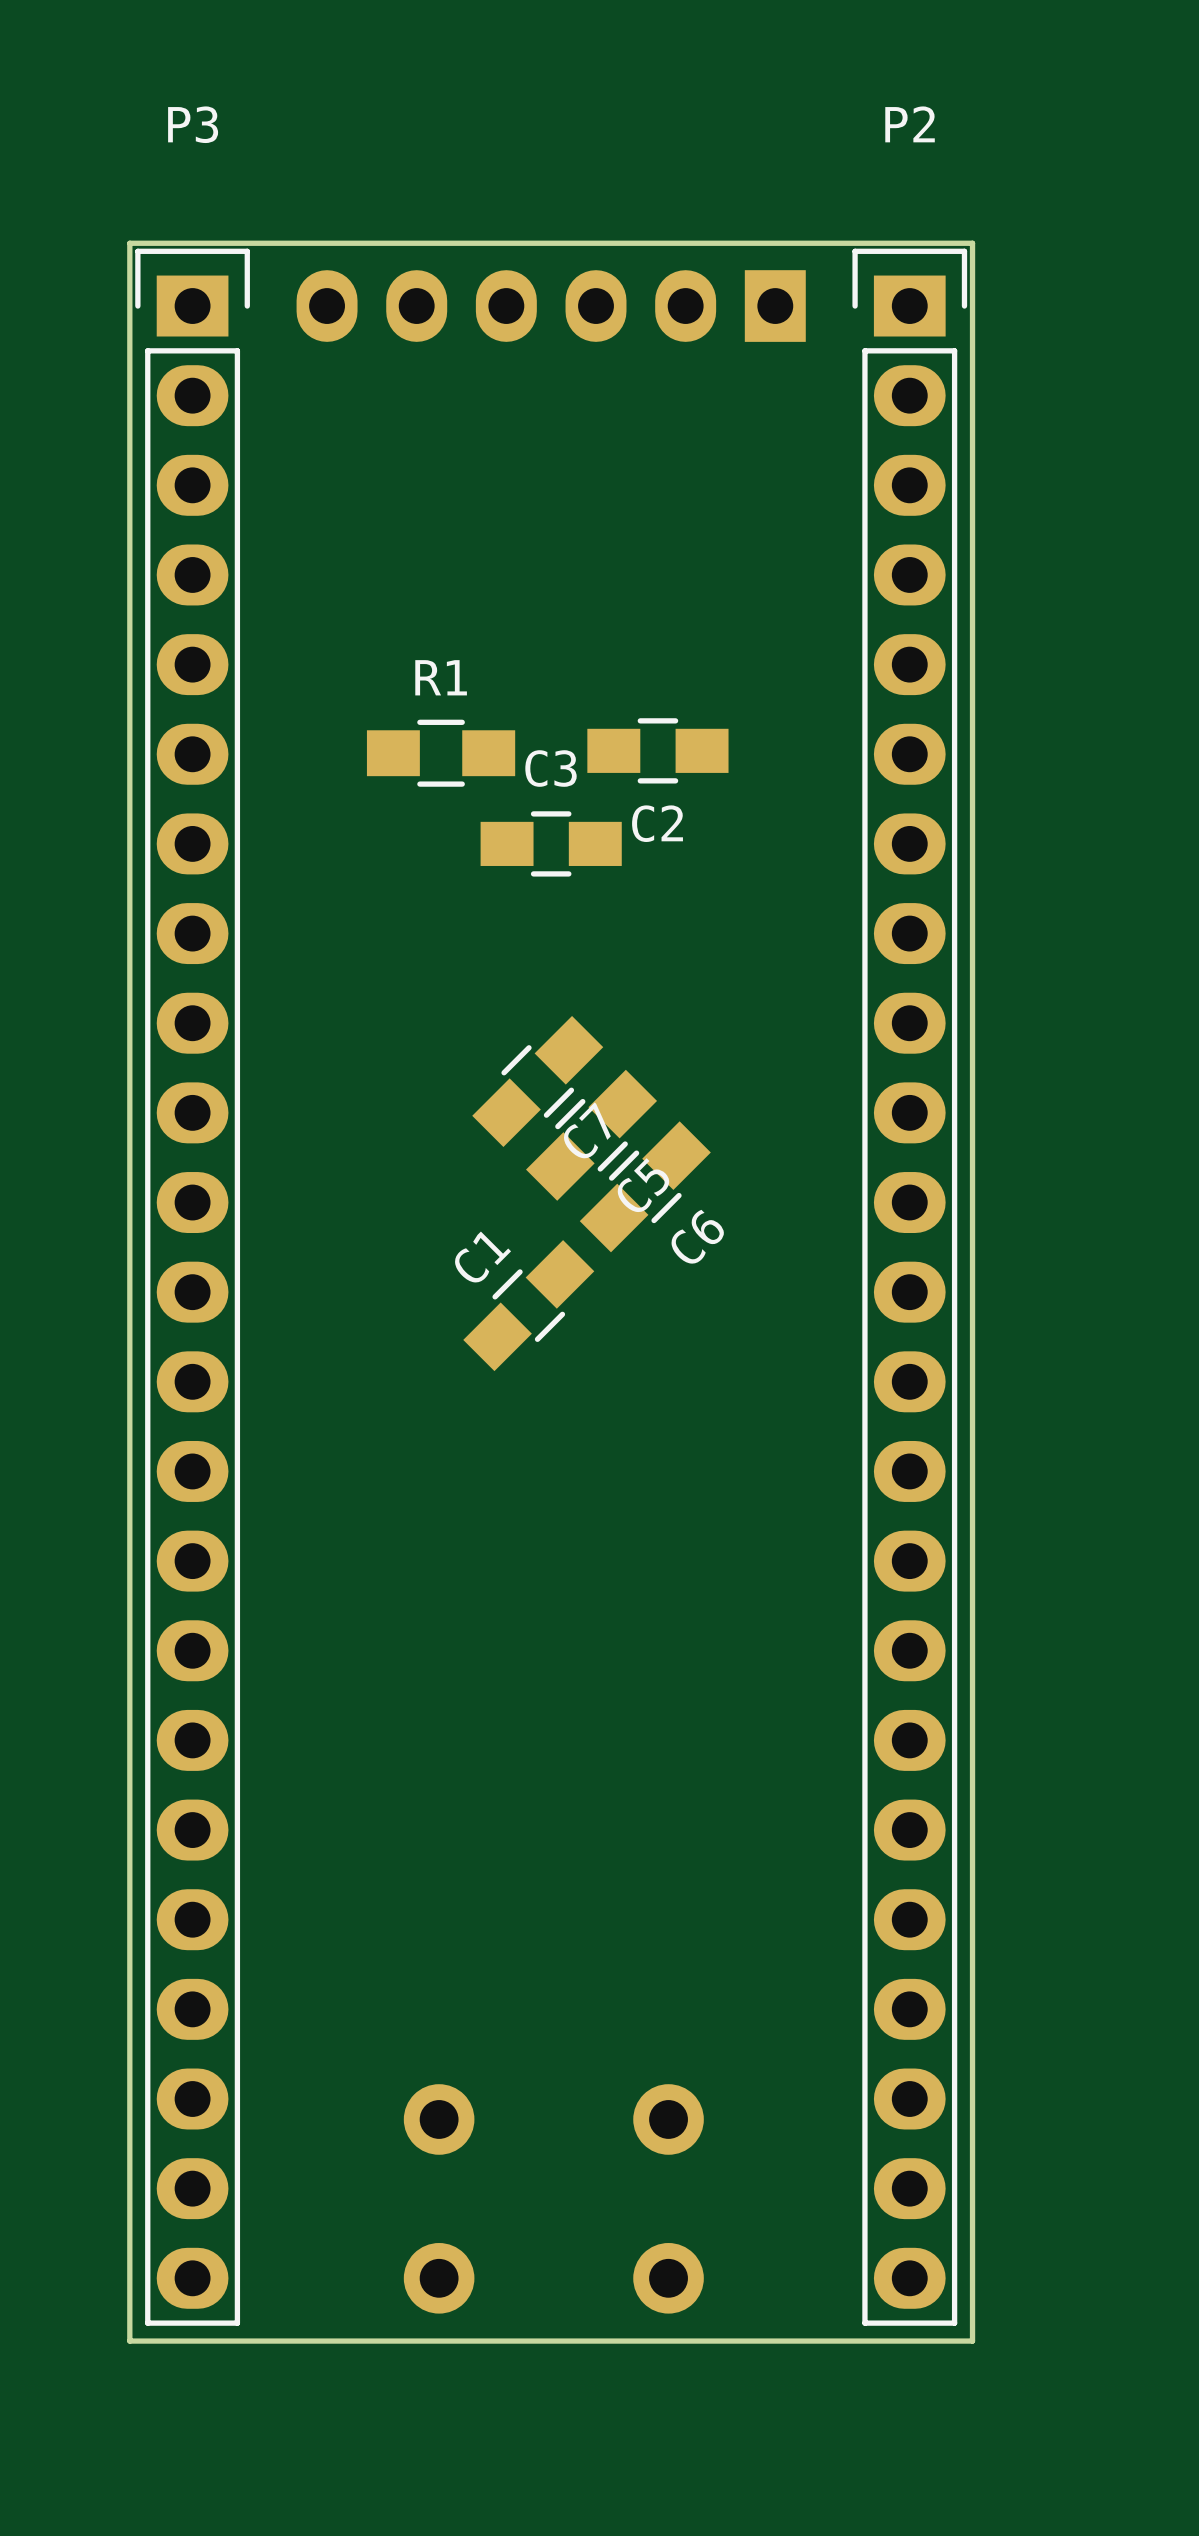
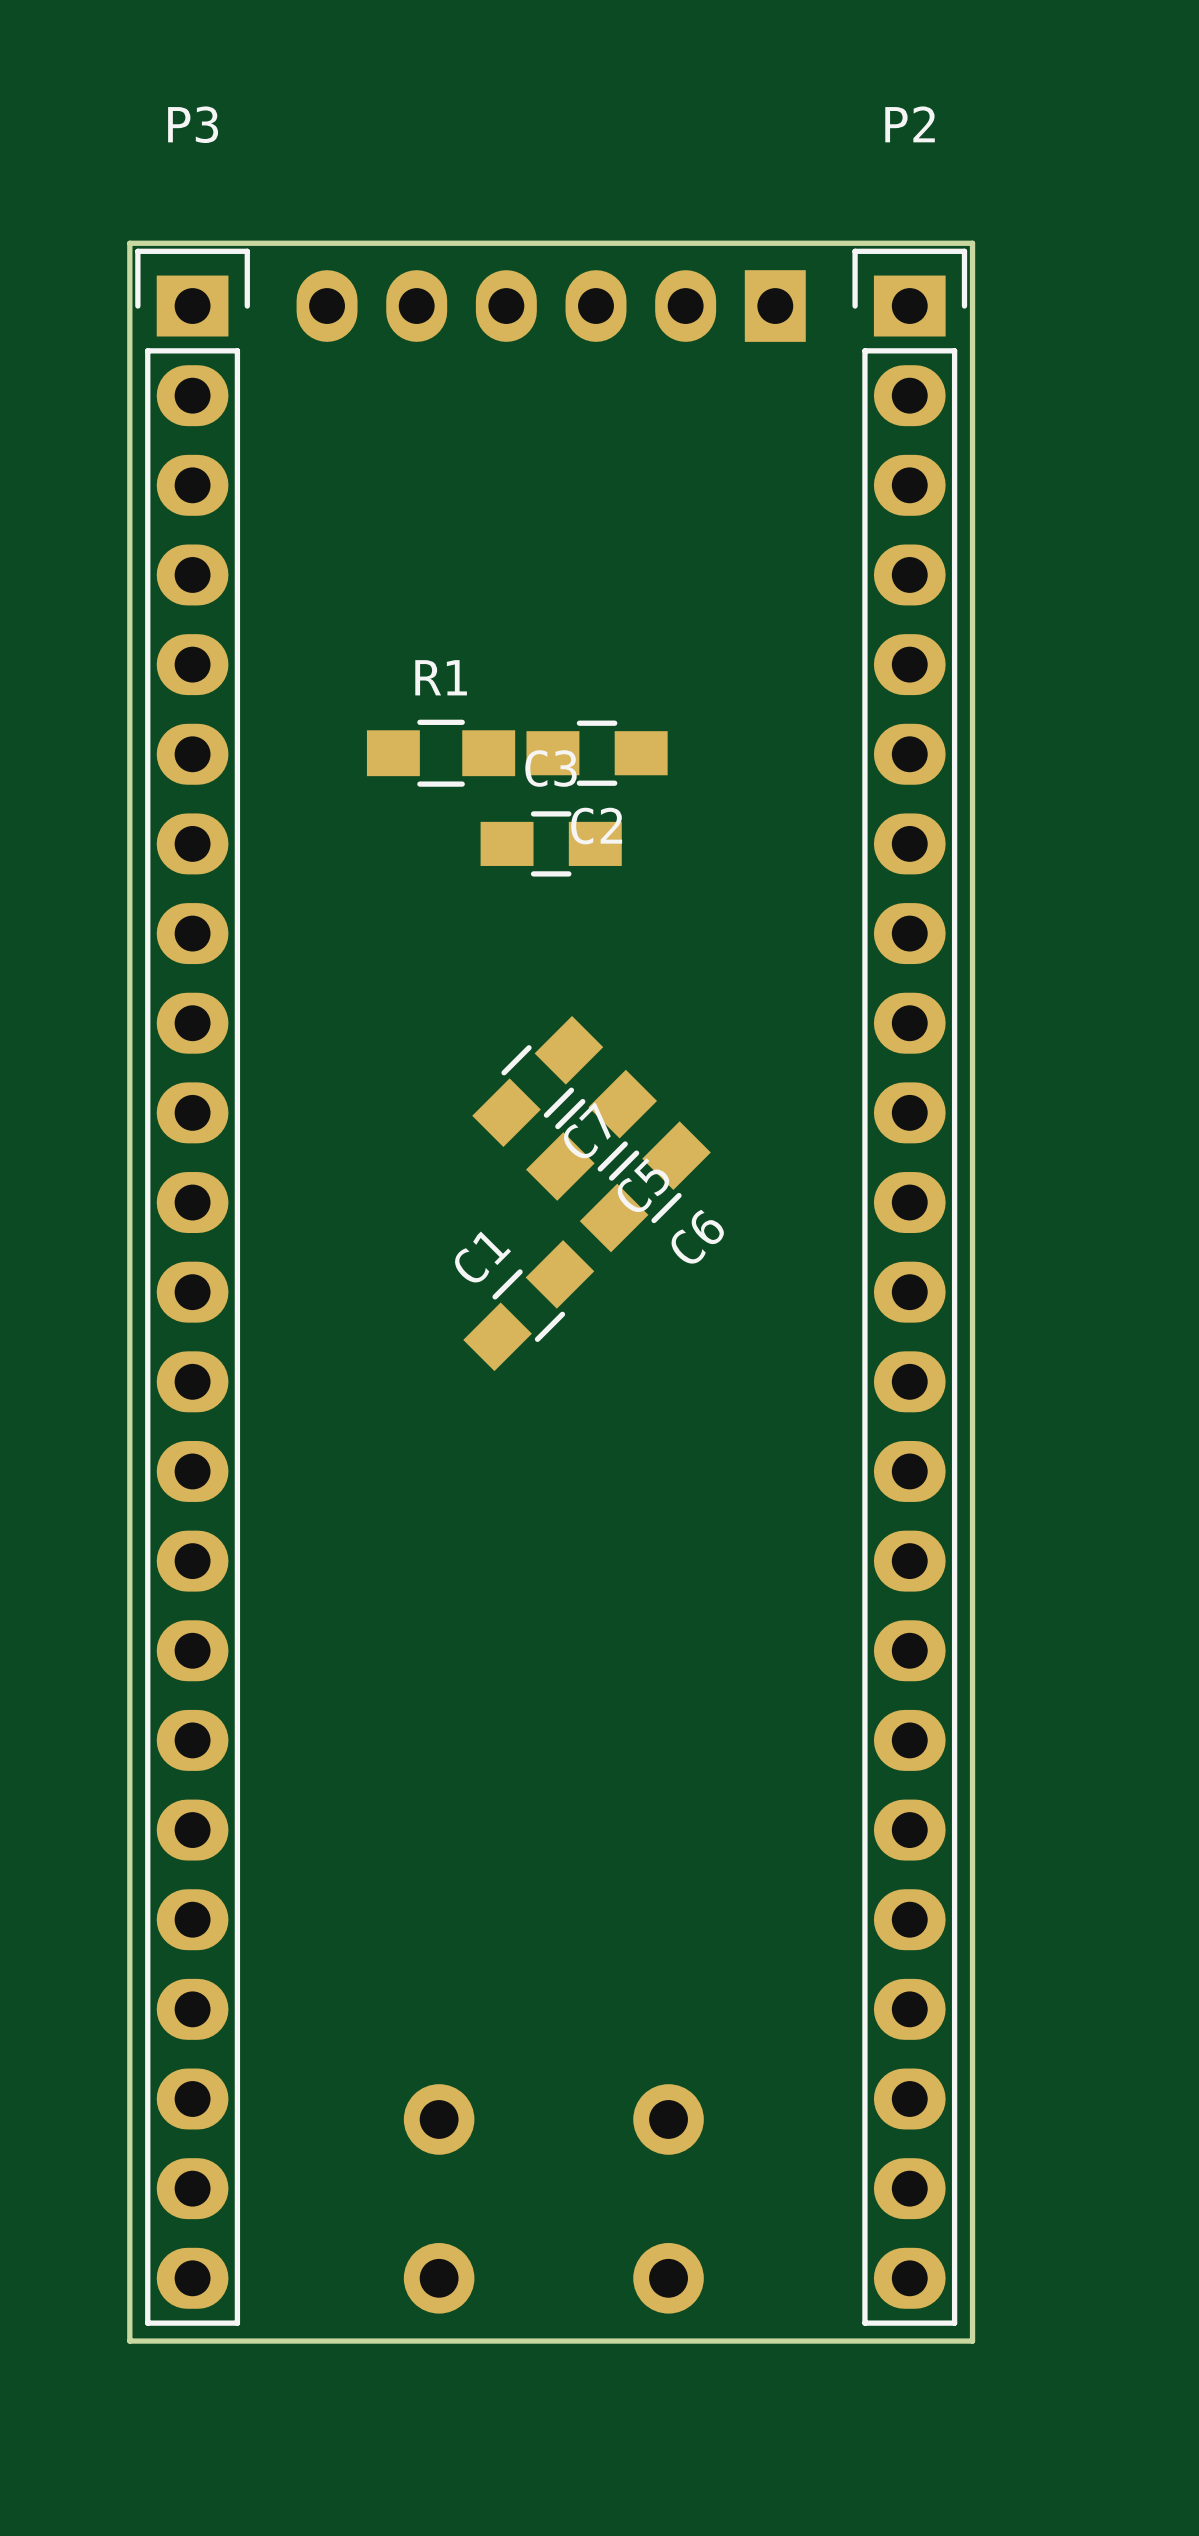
C2 position: (657, 750) -> (597, 753)

